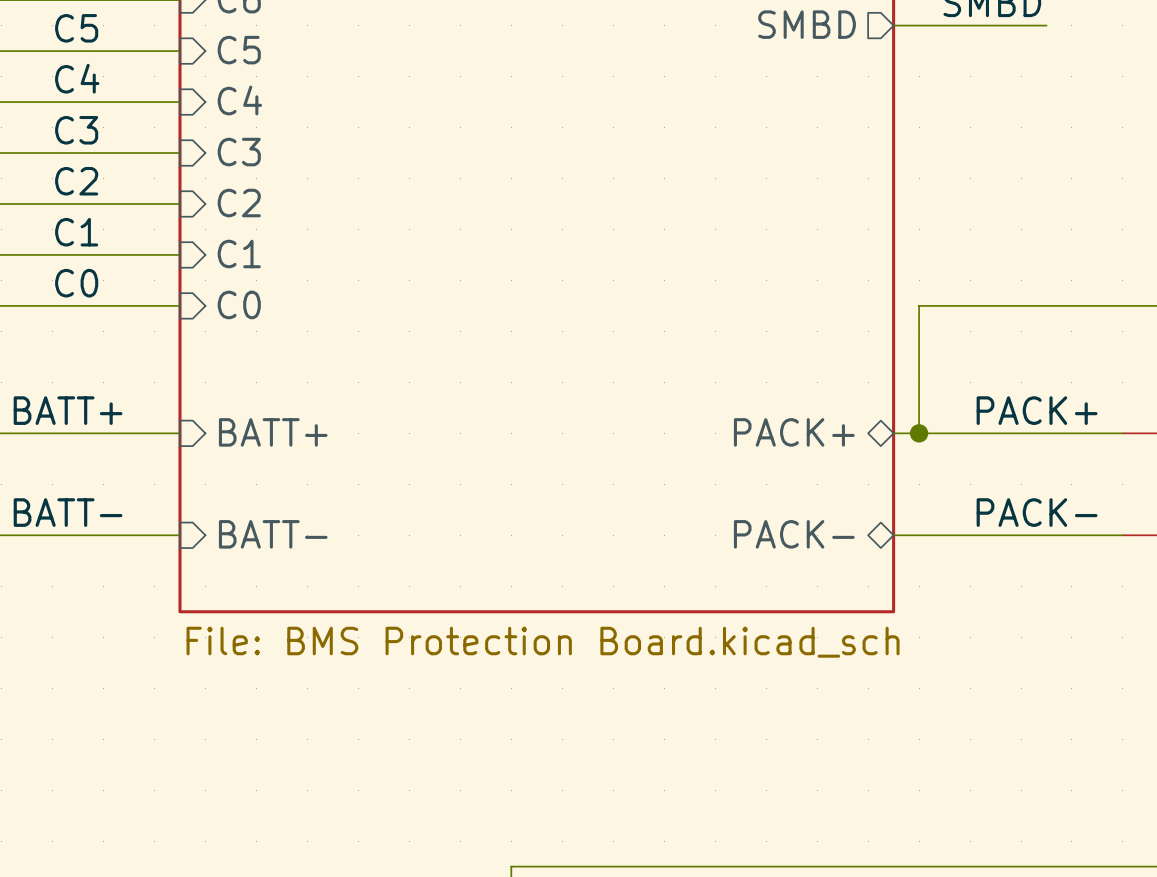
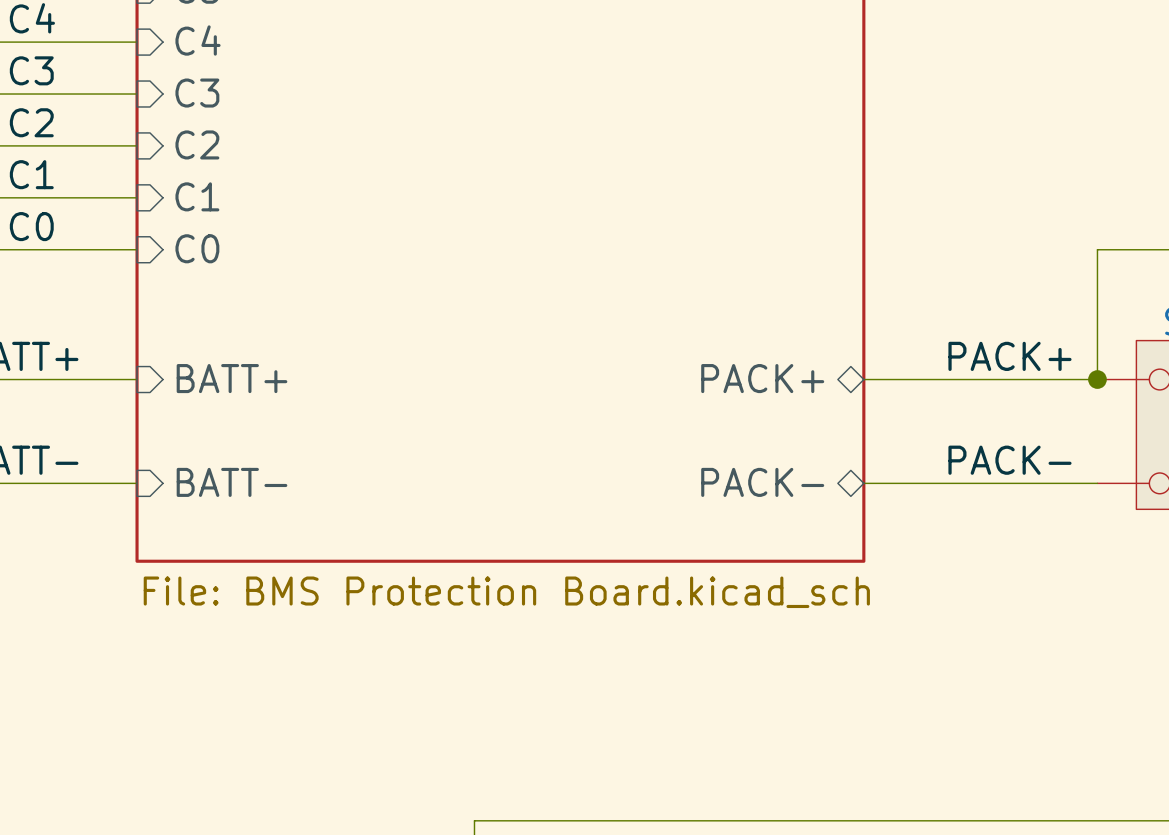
wire: (1122, 305) (919, 305) (919, 433) -> (1097, 249) (1097, 379)
junction: (919, 433) -> none
junction: none -> (1097, 379)

